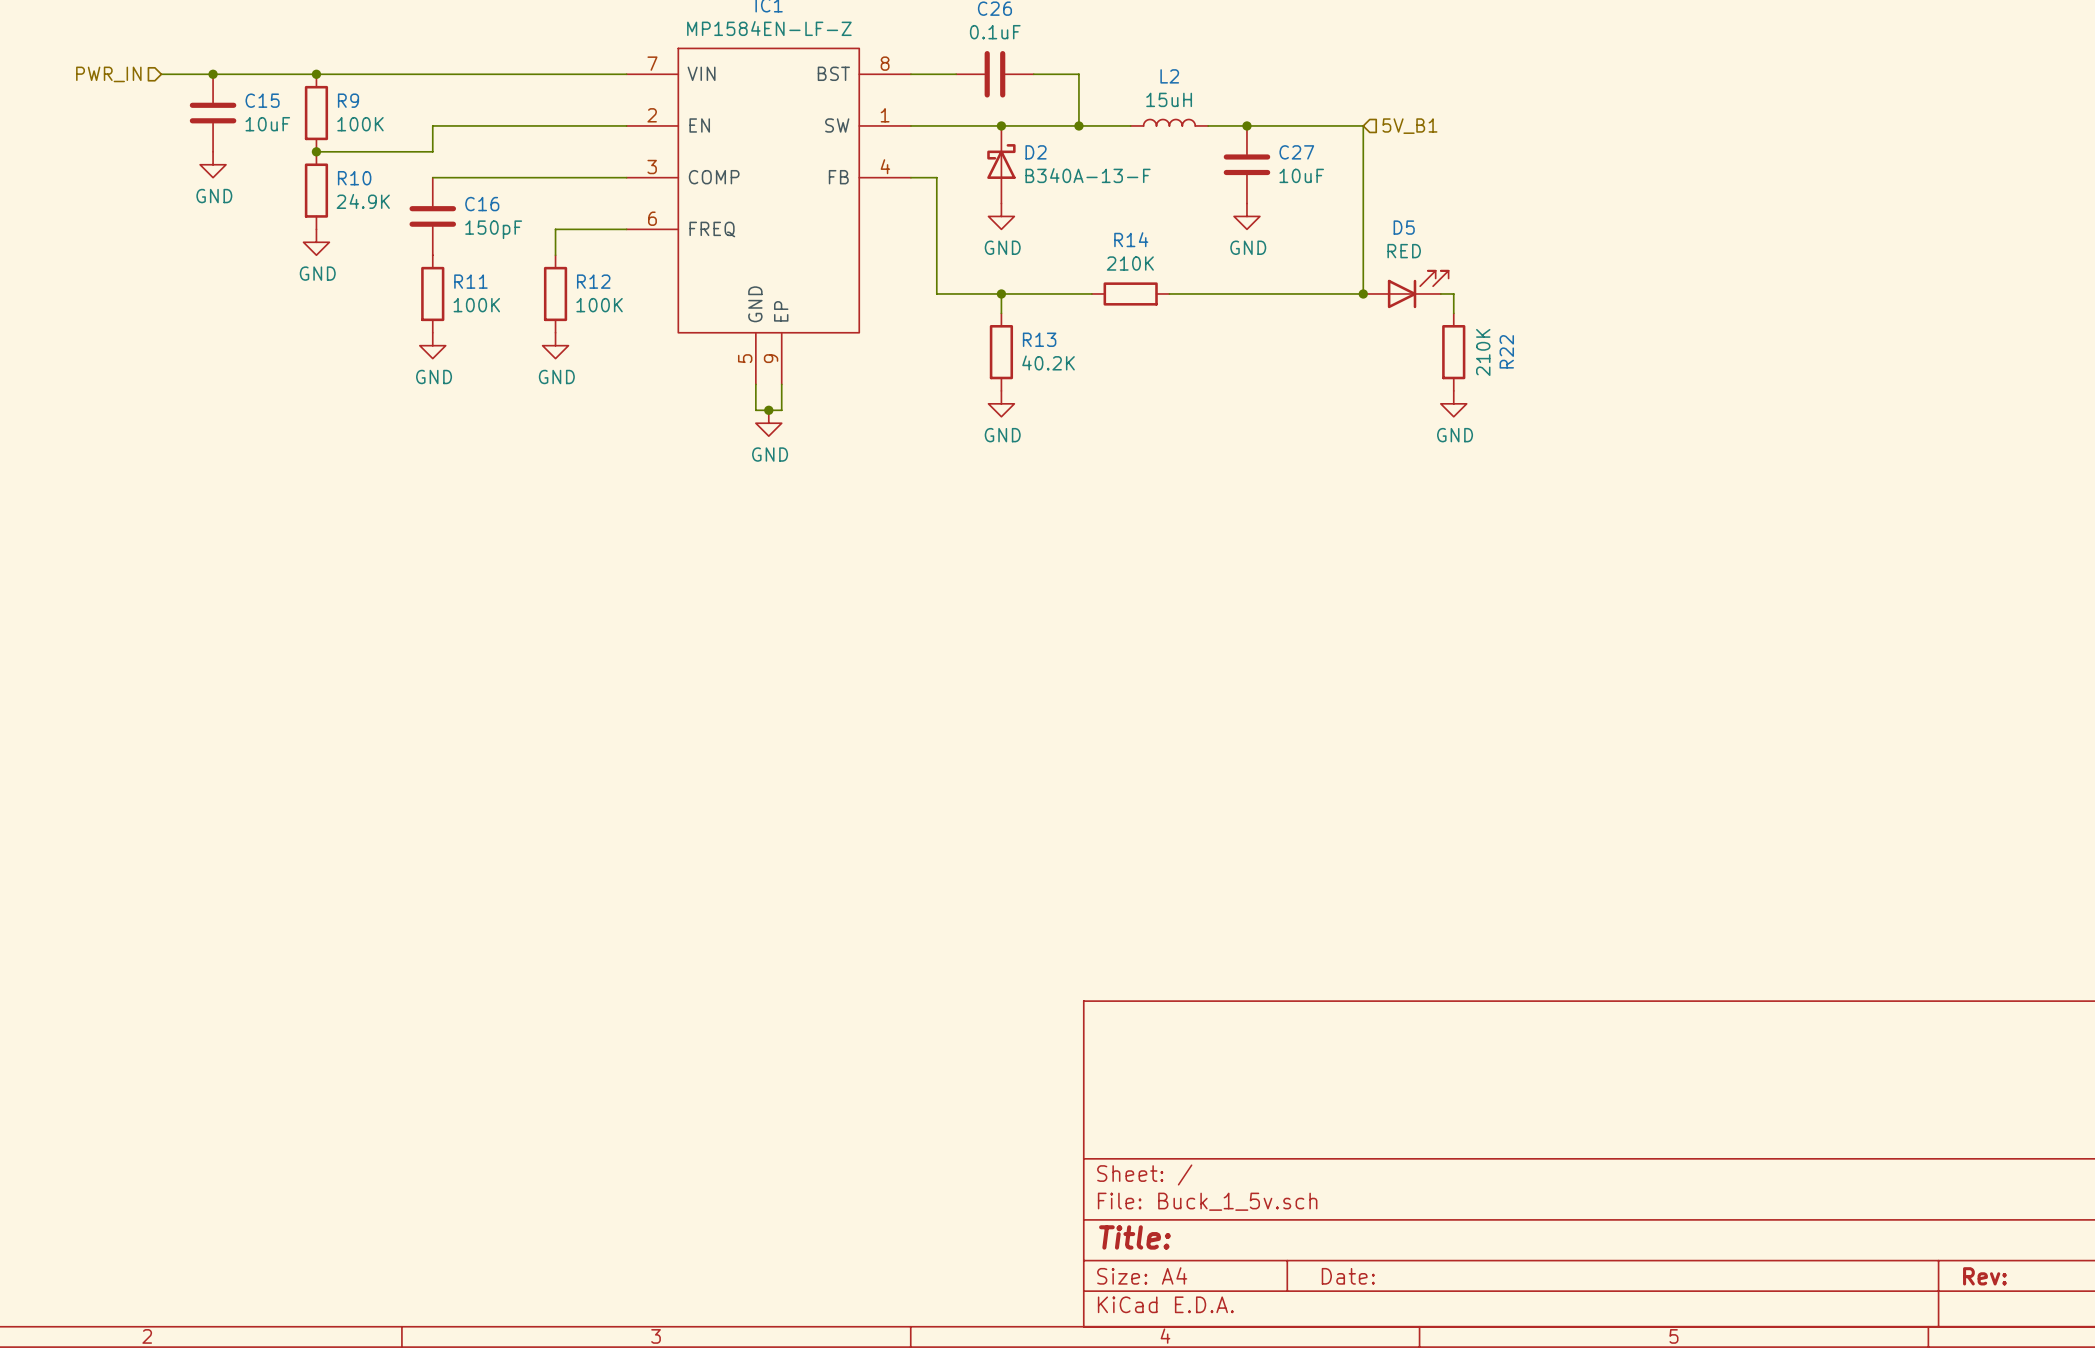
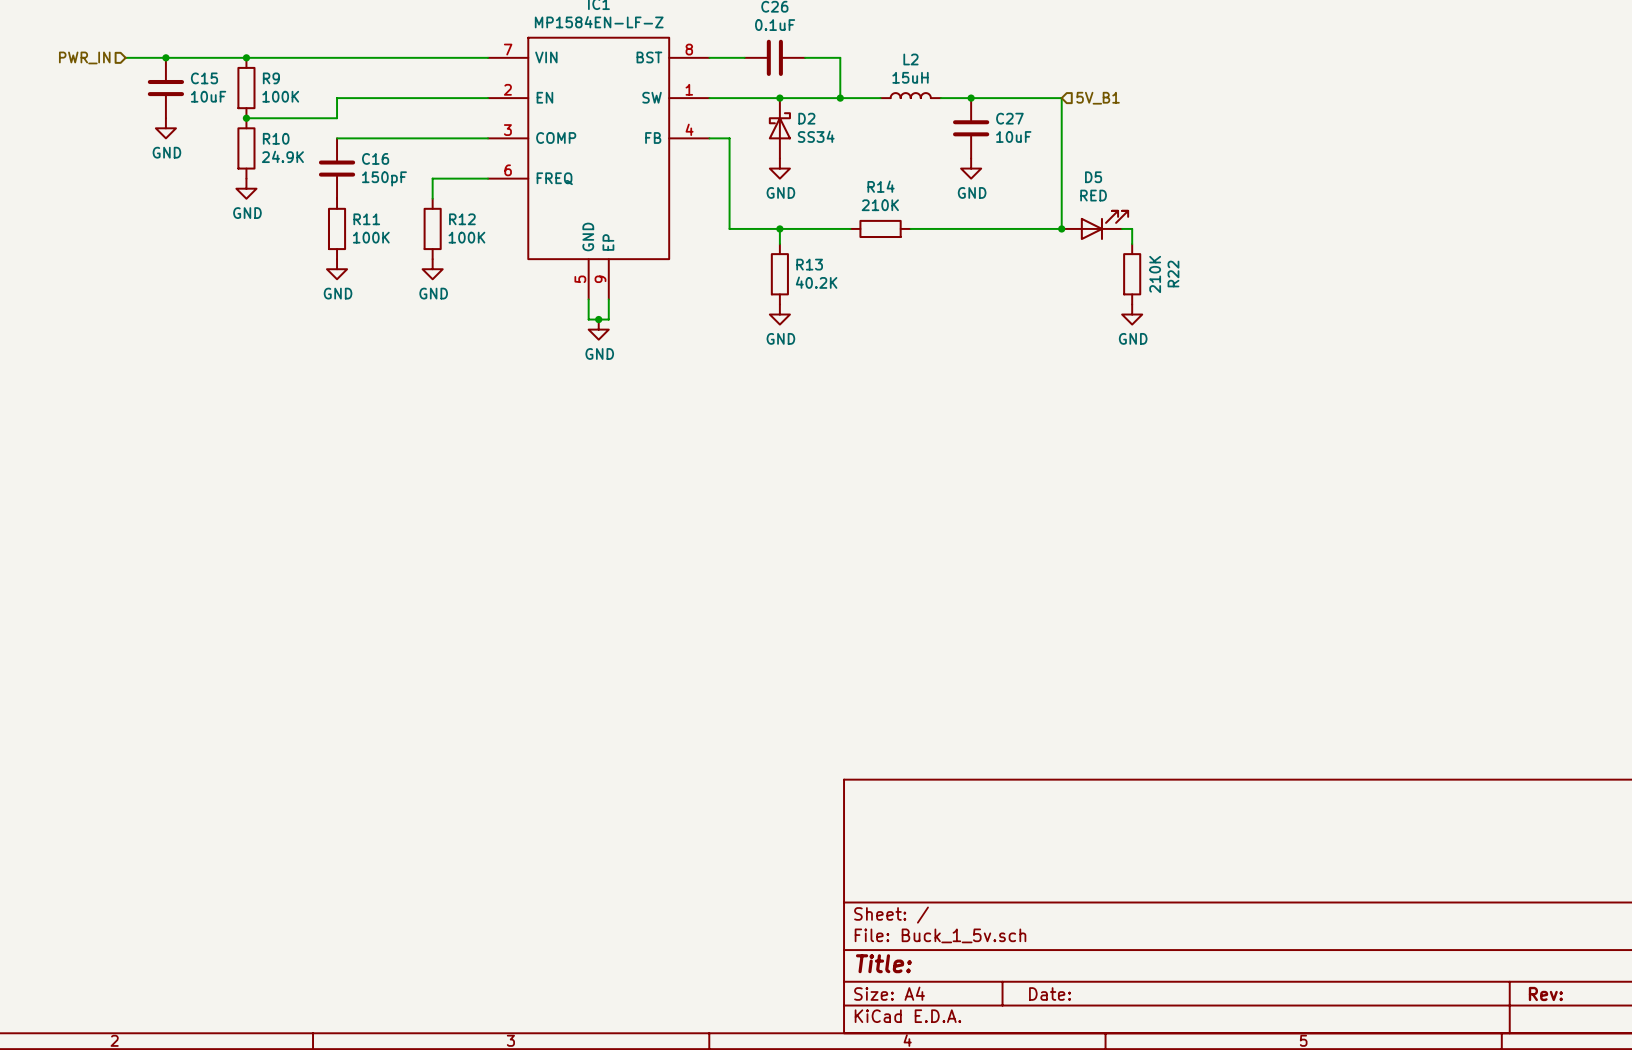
D2 value: B340A-13-F (1088, 175) -> SS34 (816, 136)

